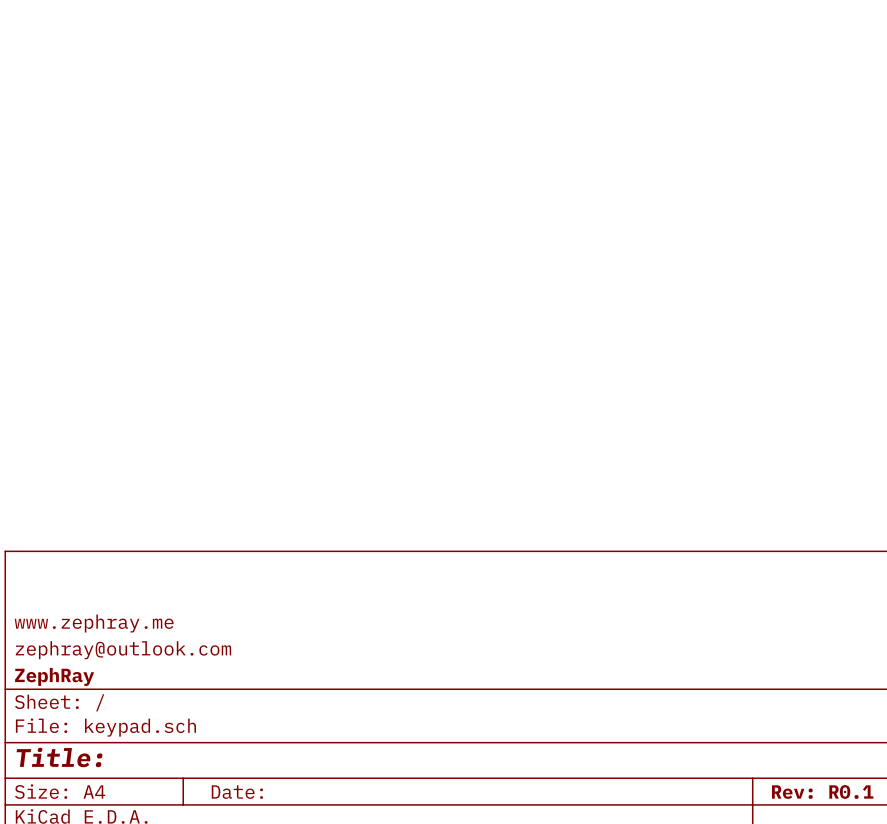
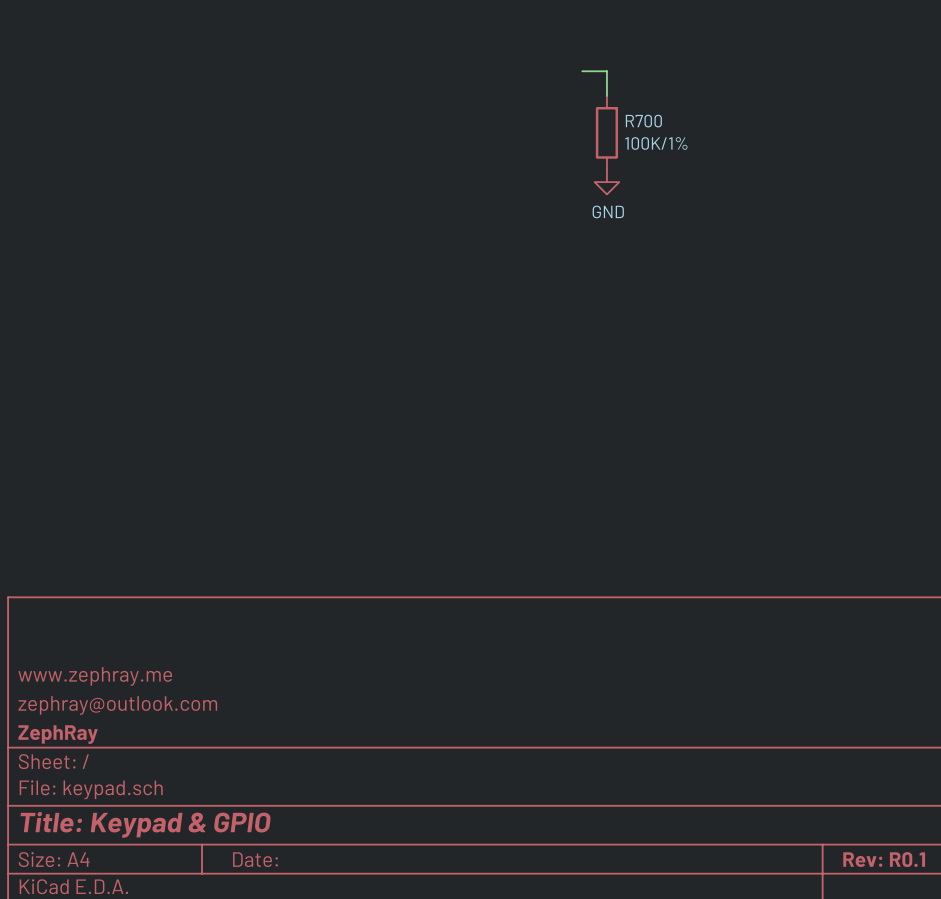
wire: none -> (582, 71) (606, 71) (606, 95)
R700: none -> 100K/1% (606, 132)
power symbol: none -> GND (606, 182)
title block: Title: (59, 757) -> Title: Keypad & GPIO (145, 824)

